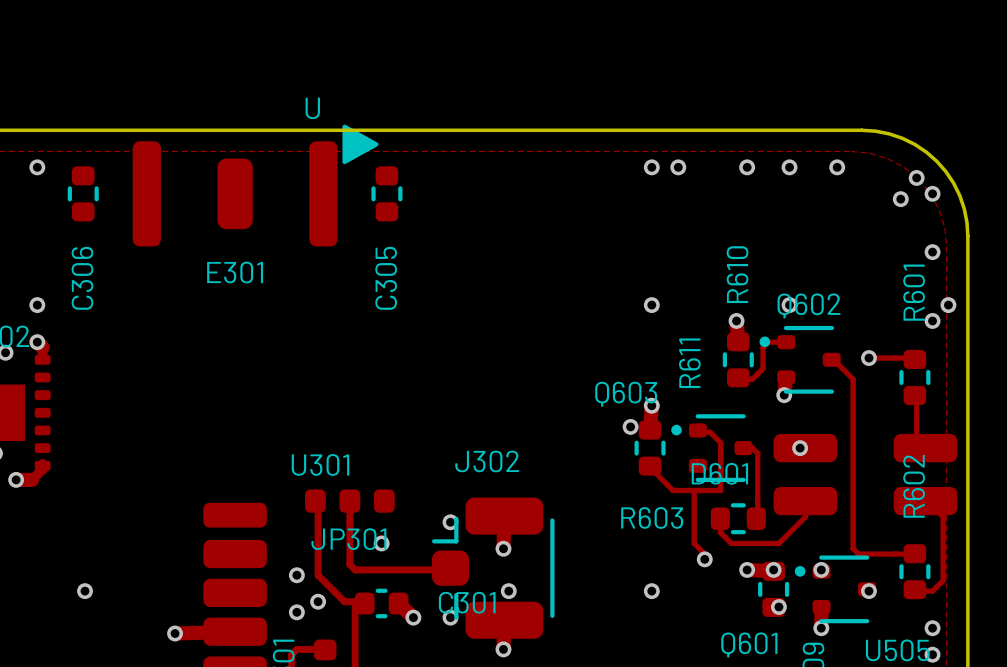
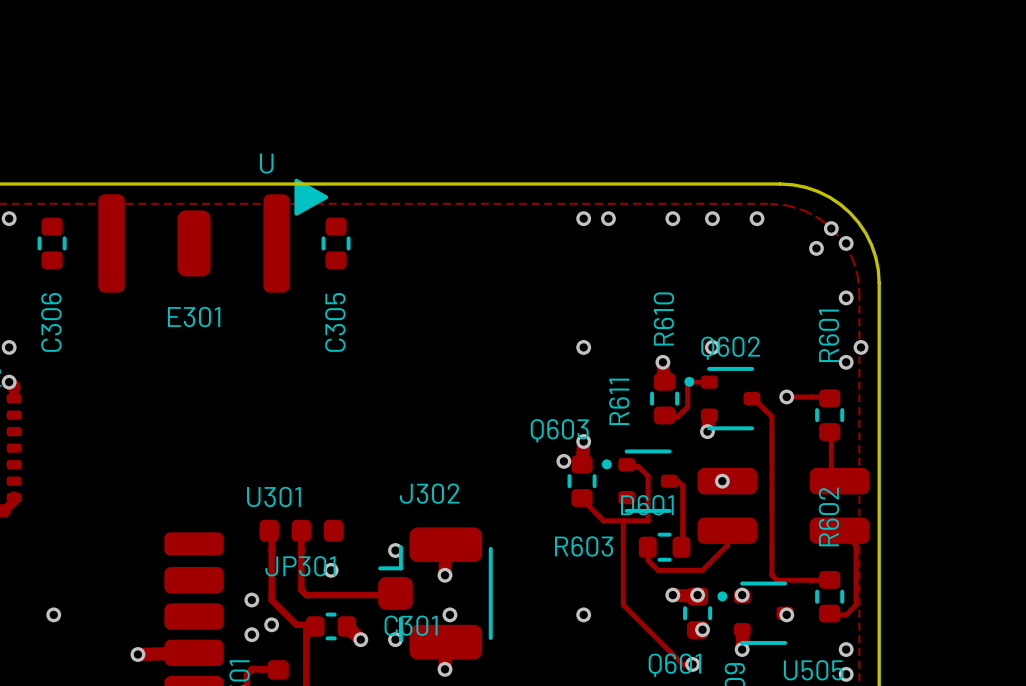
track: (694, 543) (704, 554) (704, 559) -> (623, 570) (623, 604) (682, 664) (692, 664)
via: (704, 559) -> none
via: none -> (692, 664)

